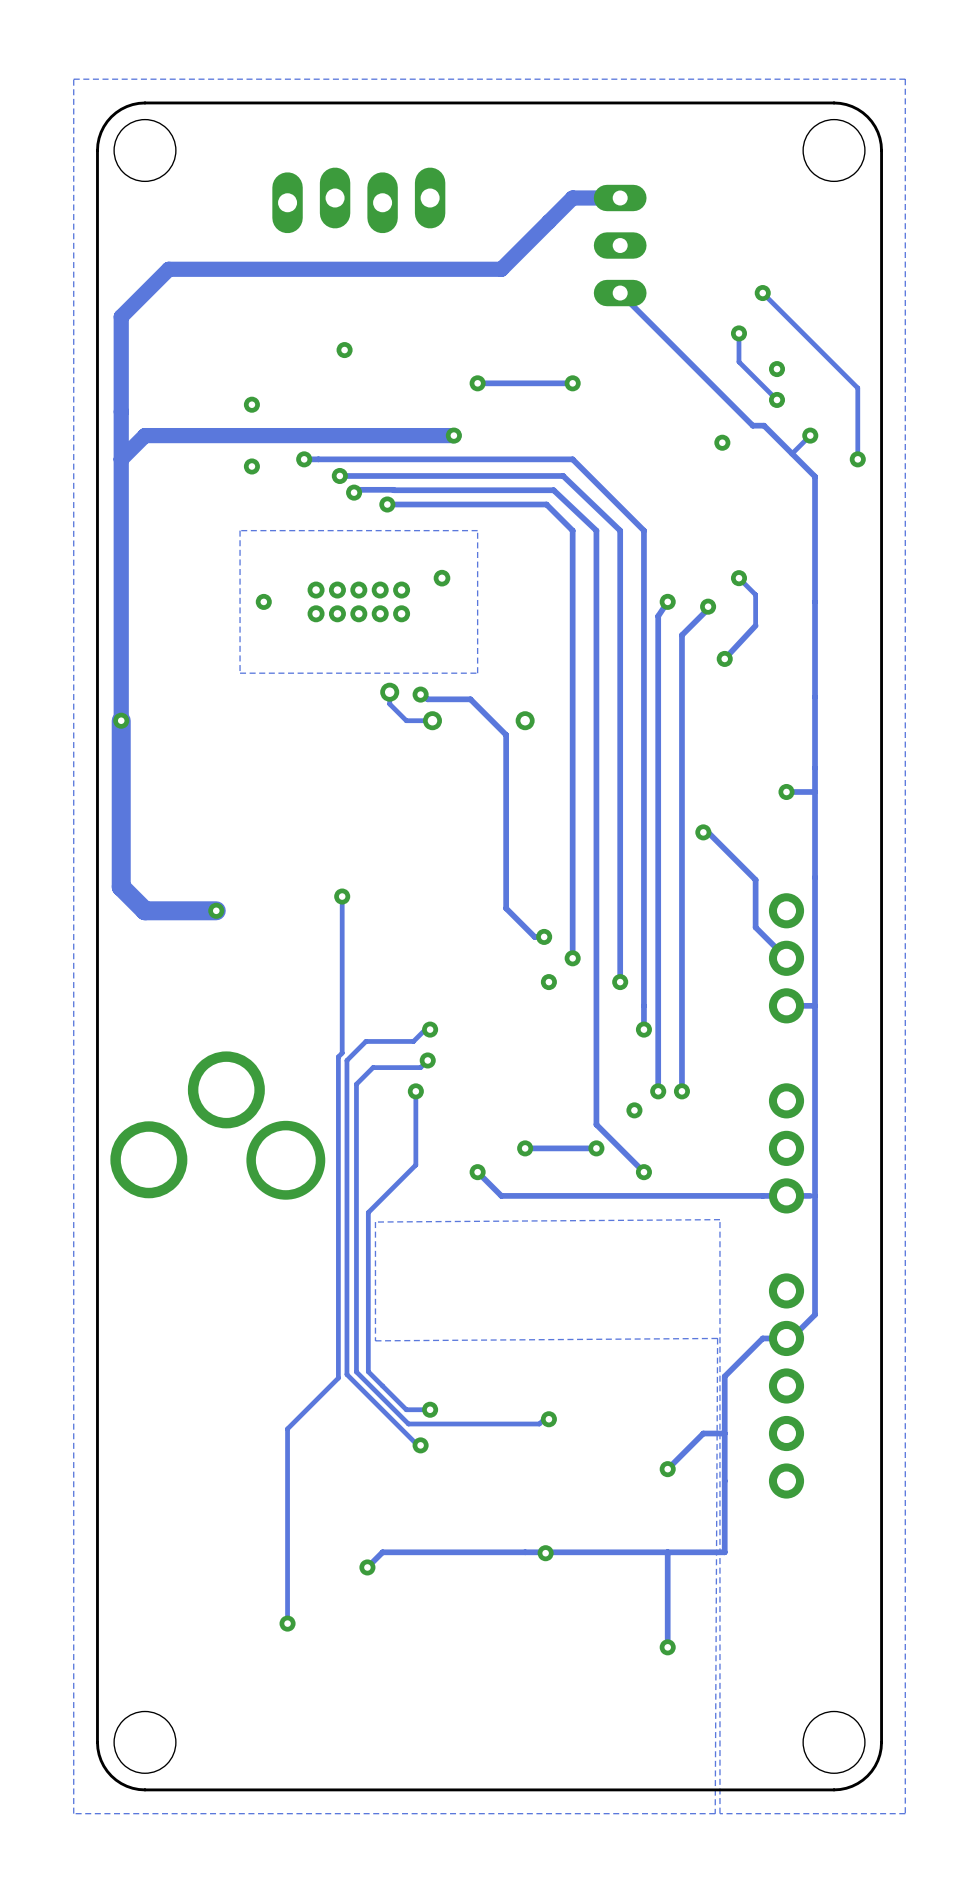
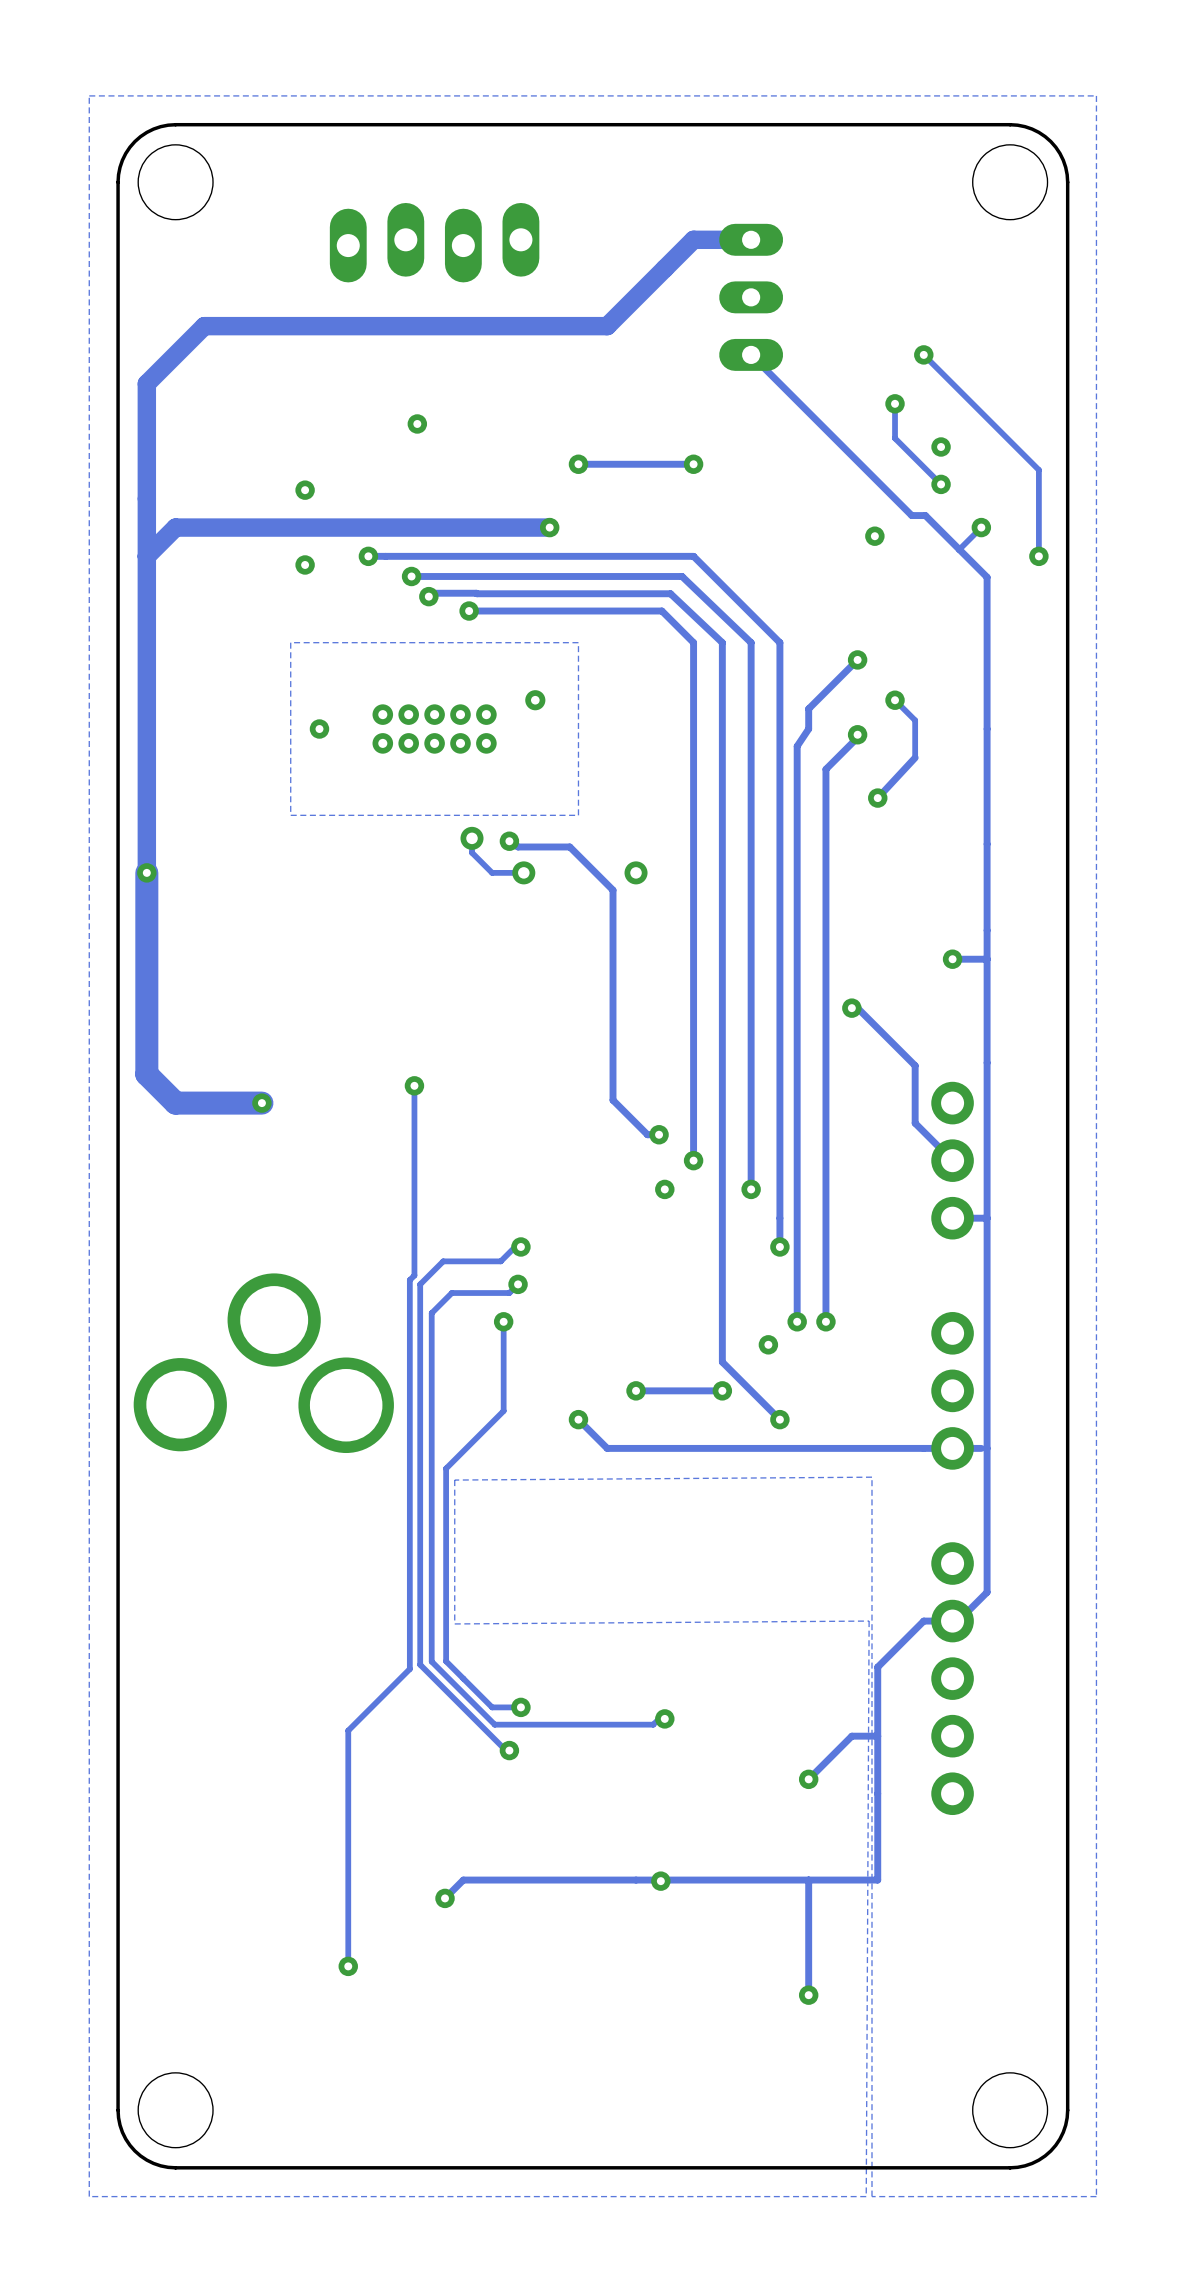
track: none -> (857, 659) (808, 708) (808, 728)
via position: (667, 601) -> (857, 659)

